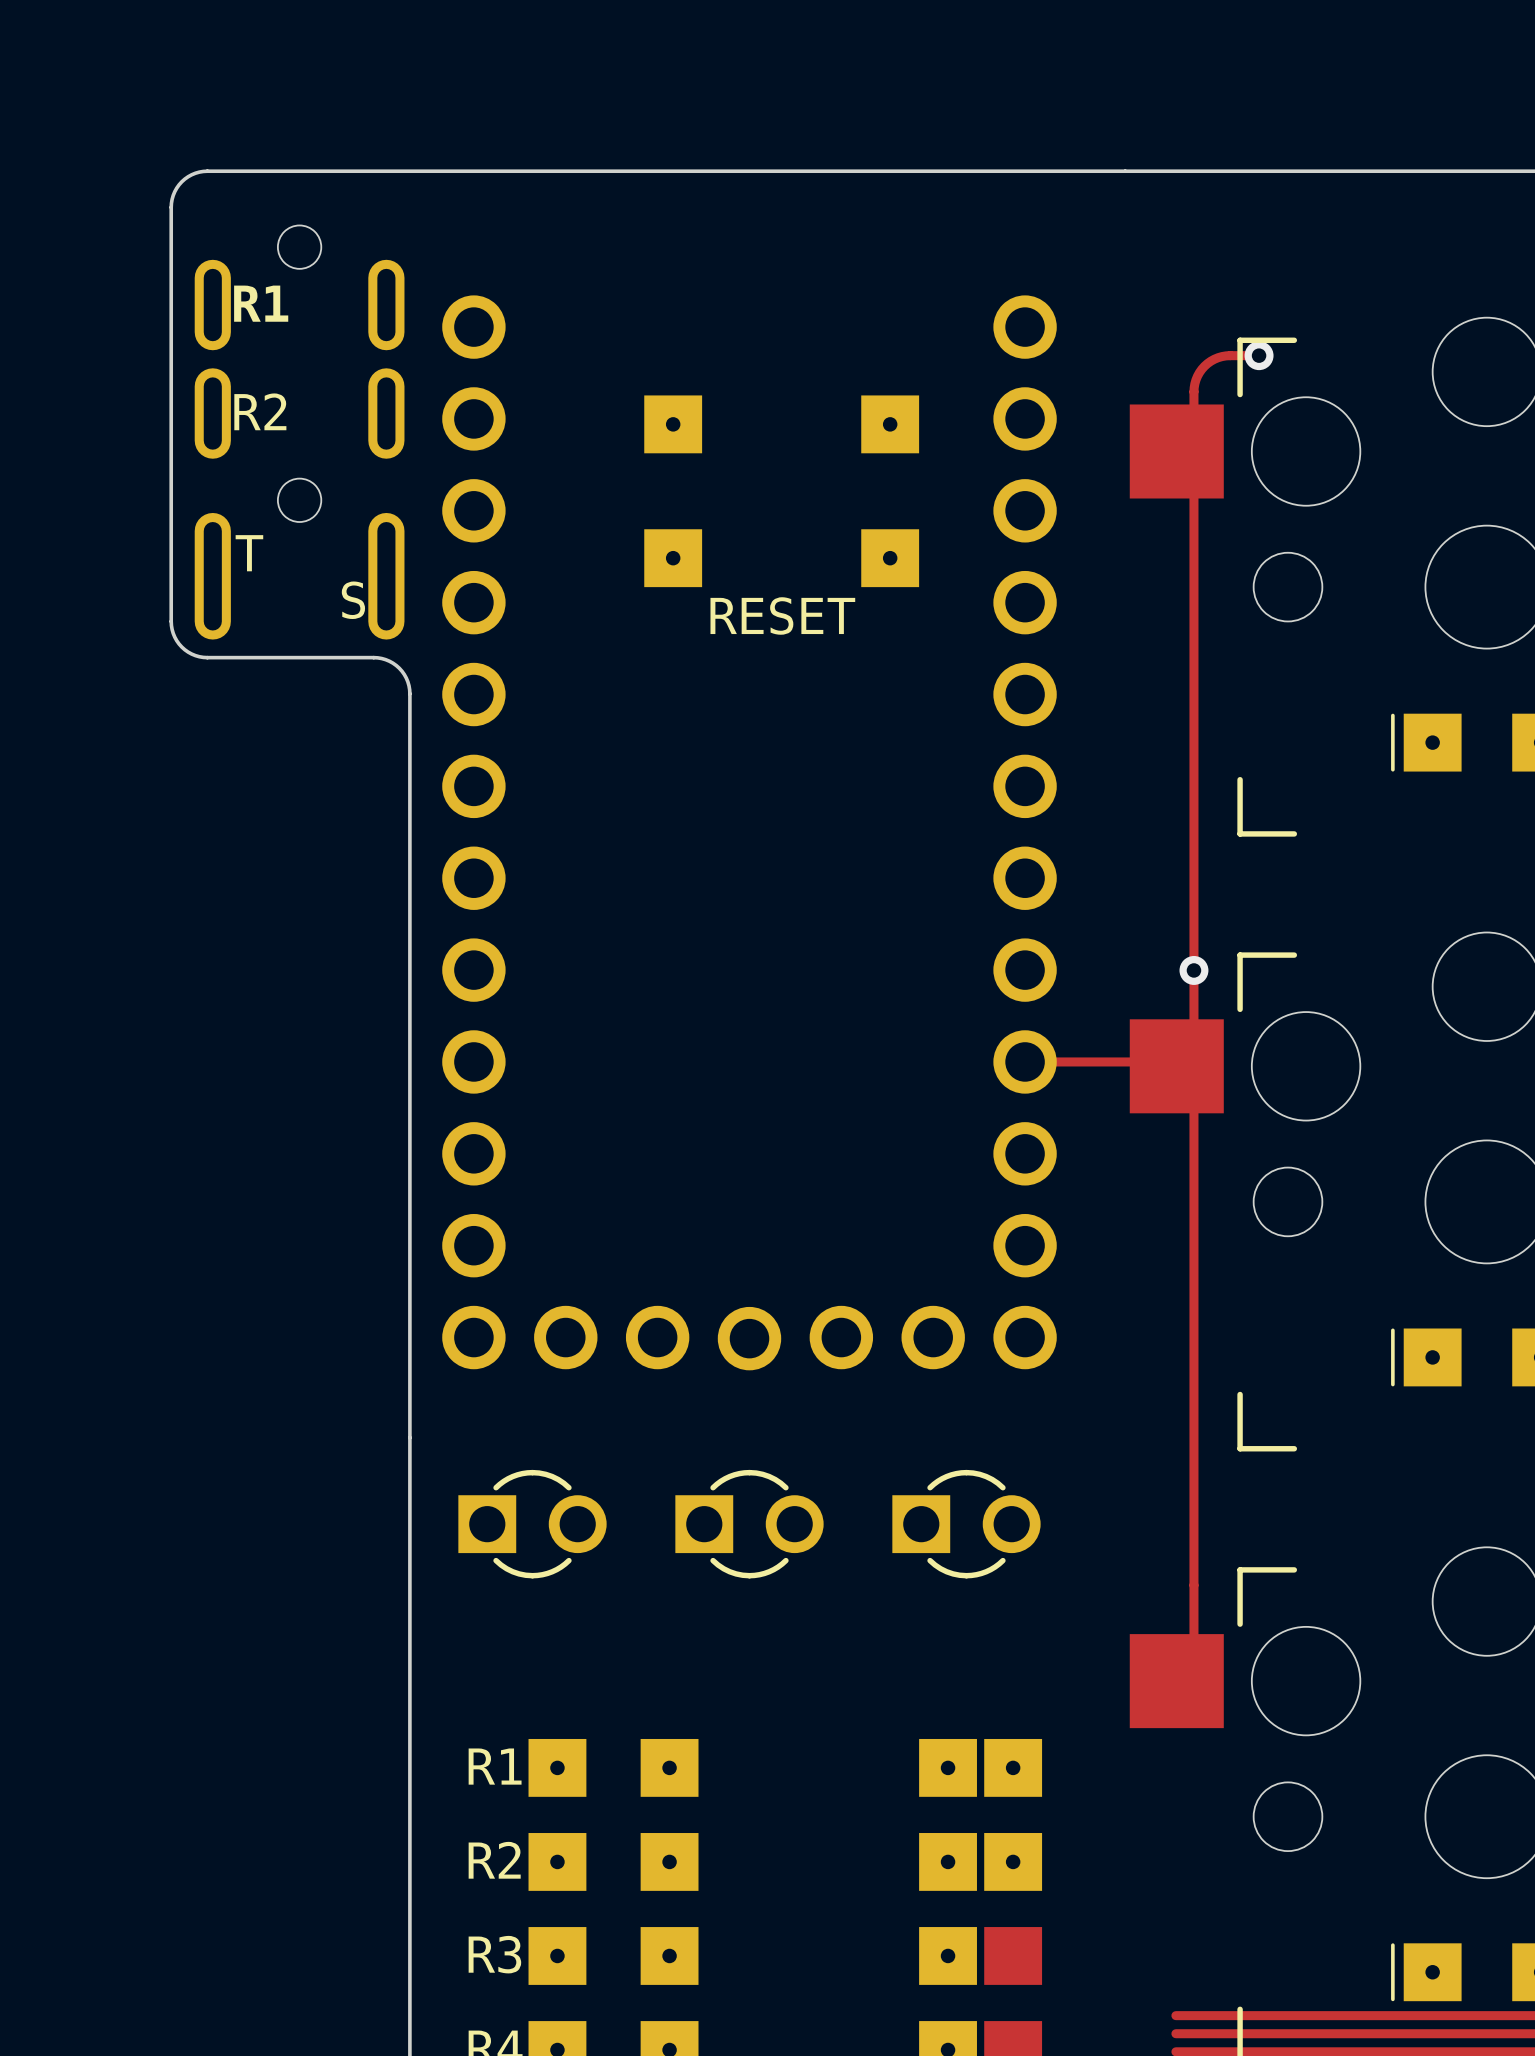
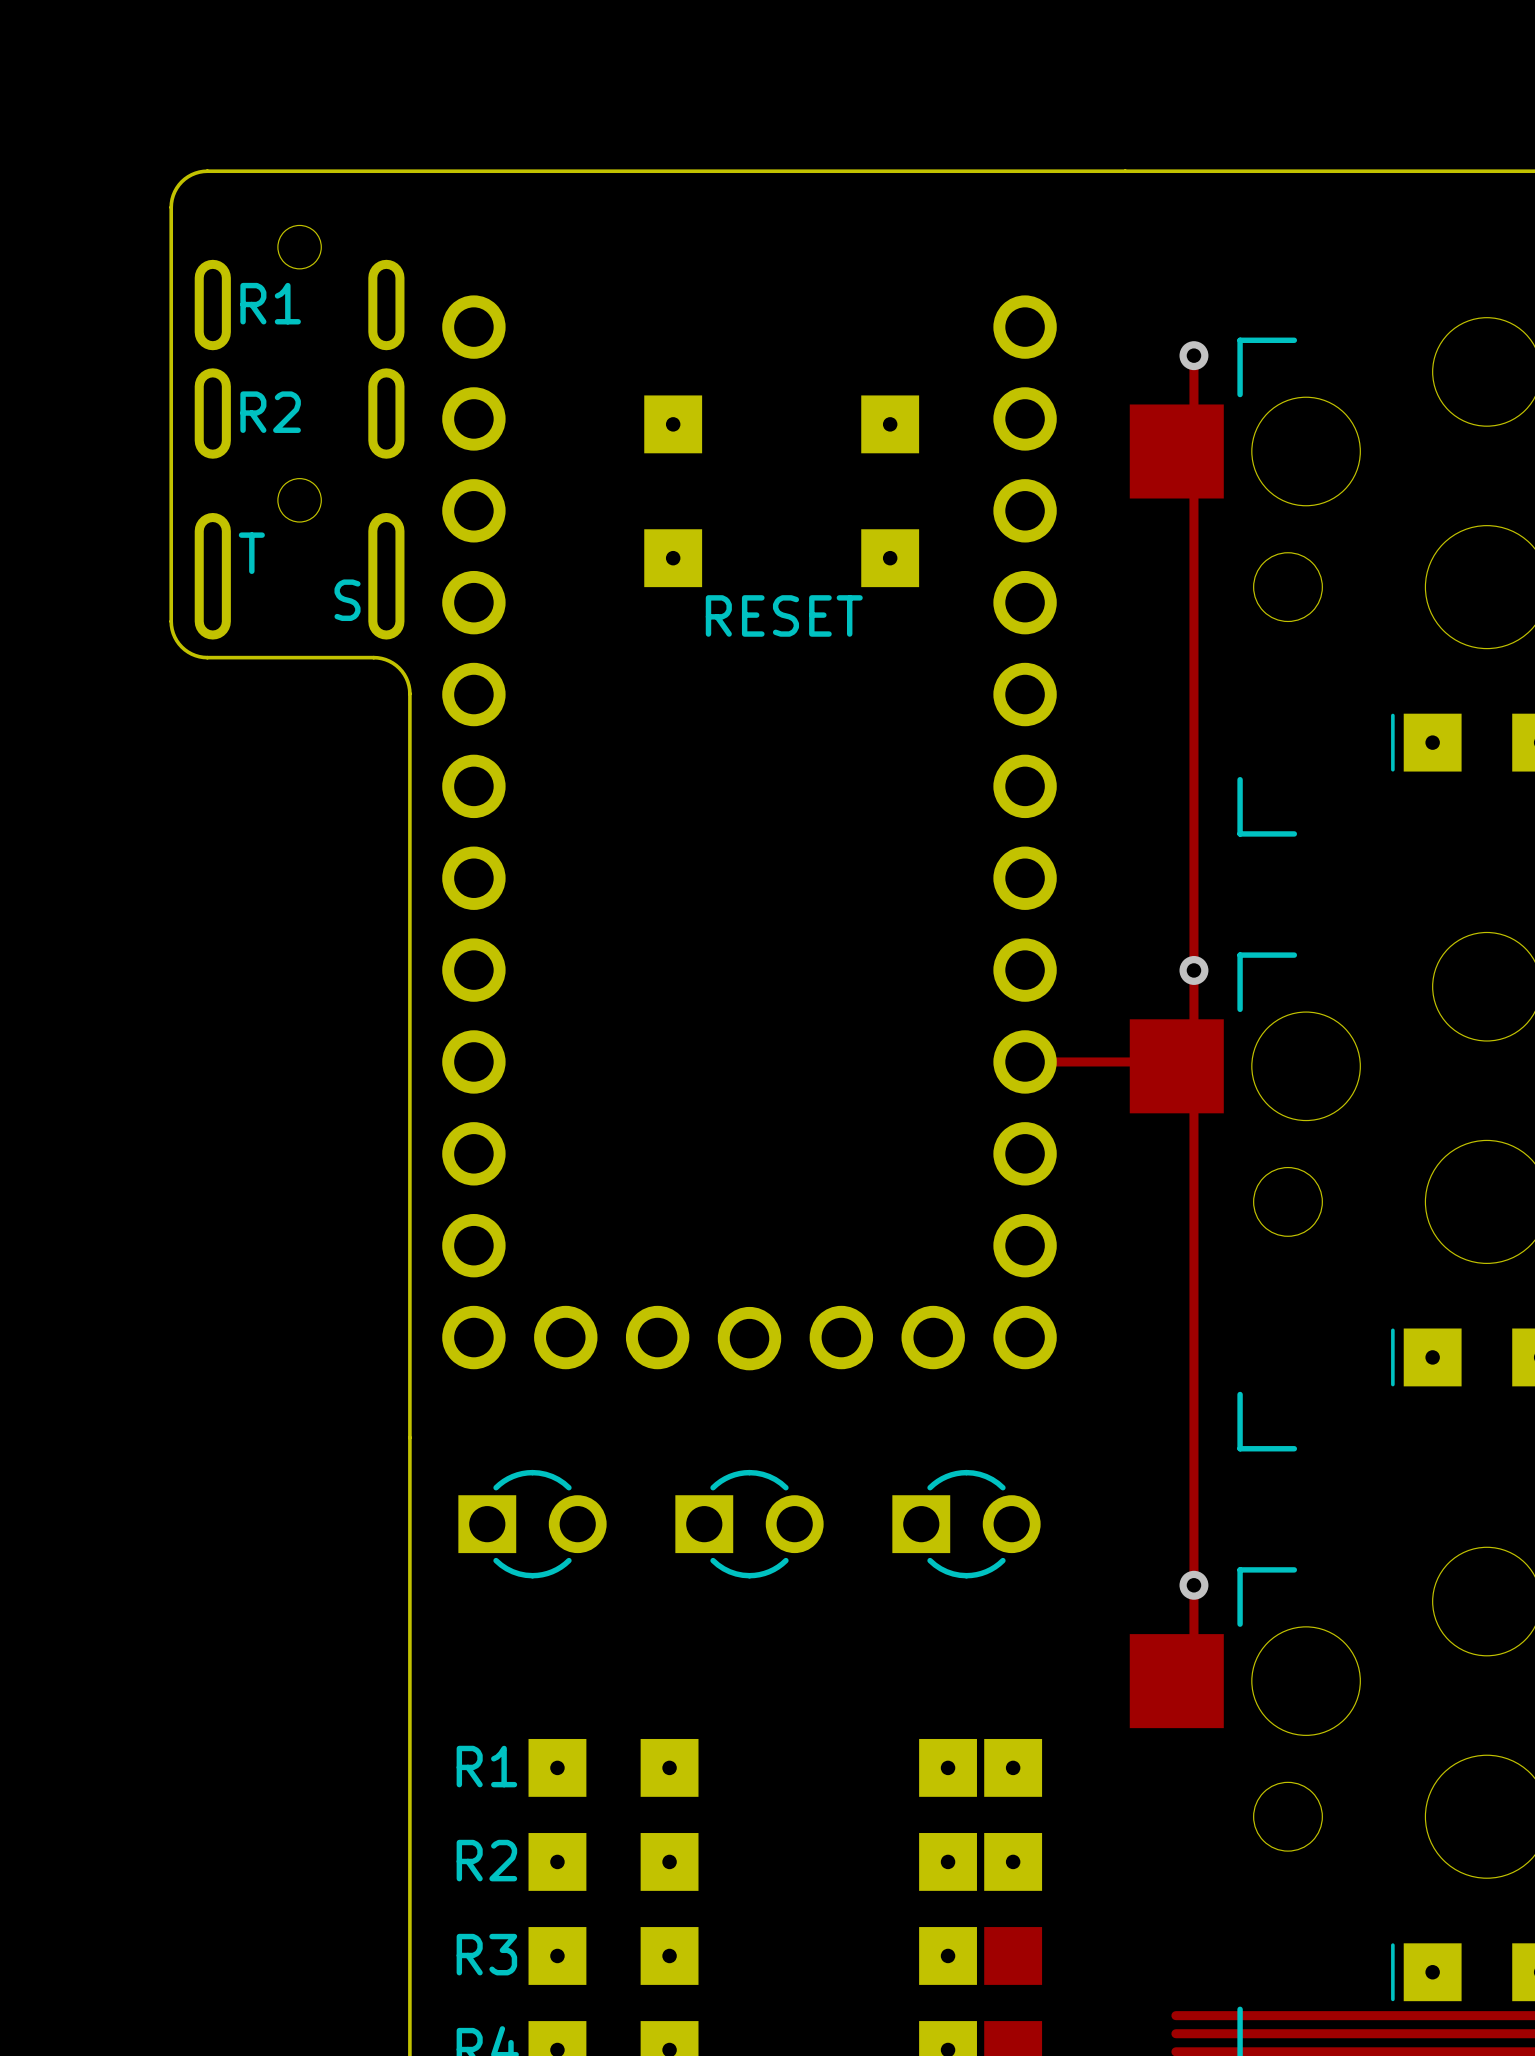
track: (1259, 355) (1226, 355) (1210, 361) (1199, 372) (1193, 391) -> (1193, 355) (1193, 391)
via position: (1259, 355) -> (1193, 355)
via: none -> (1193, 1585)

